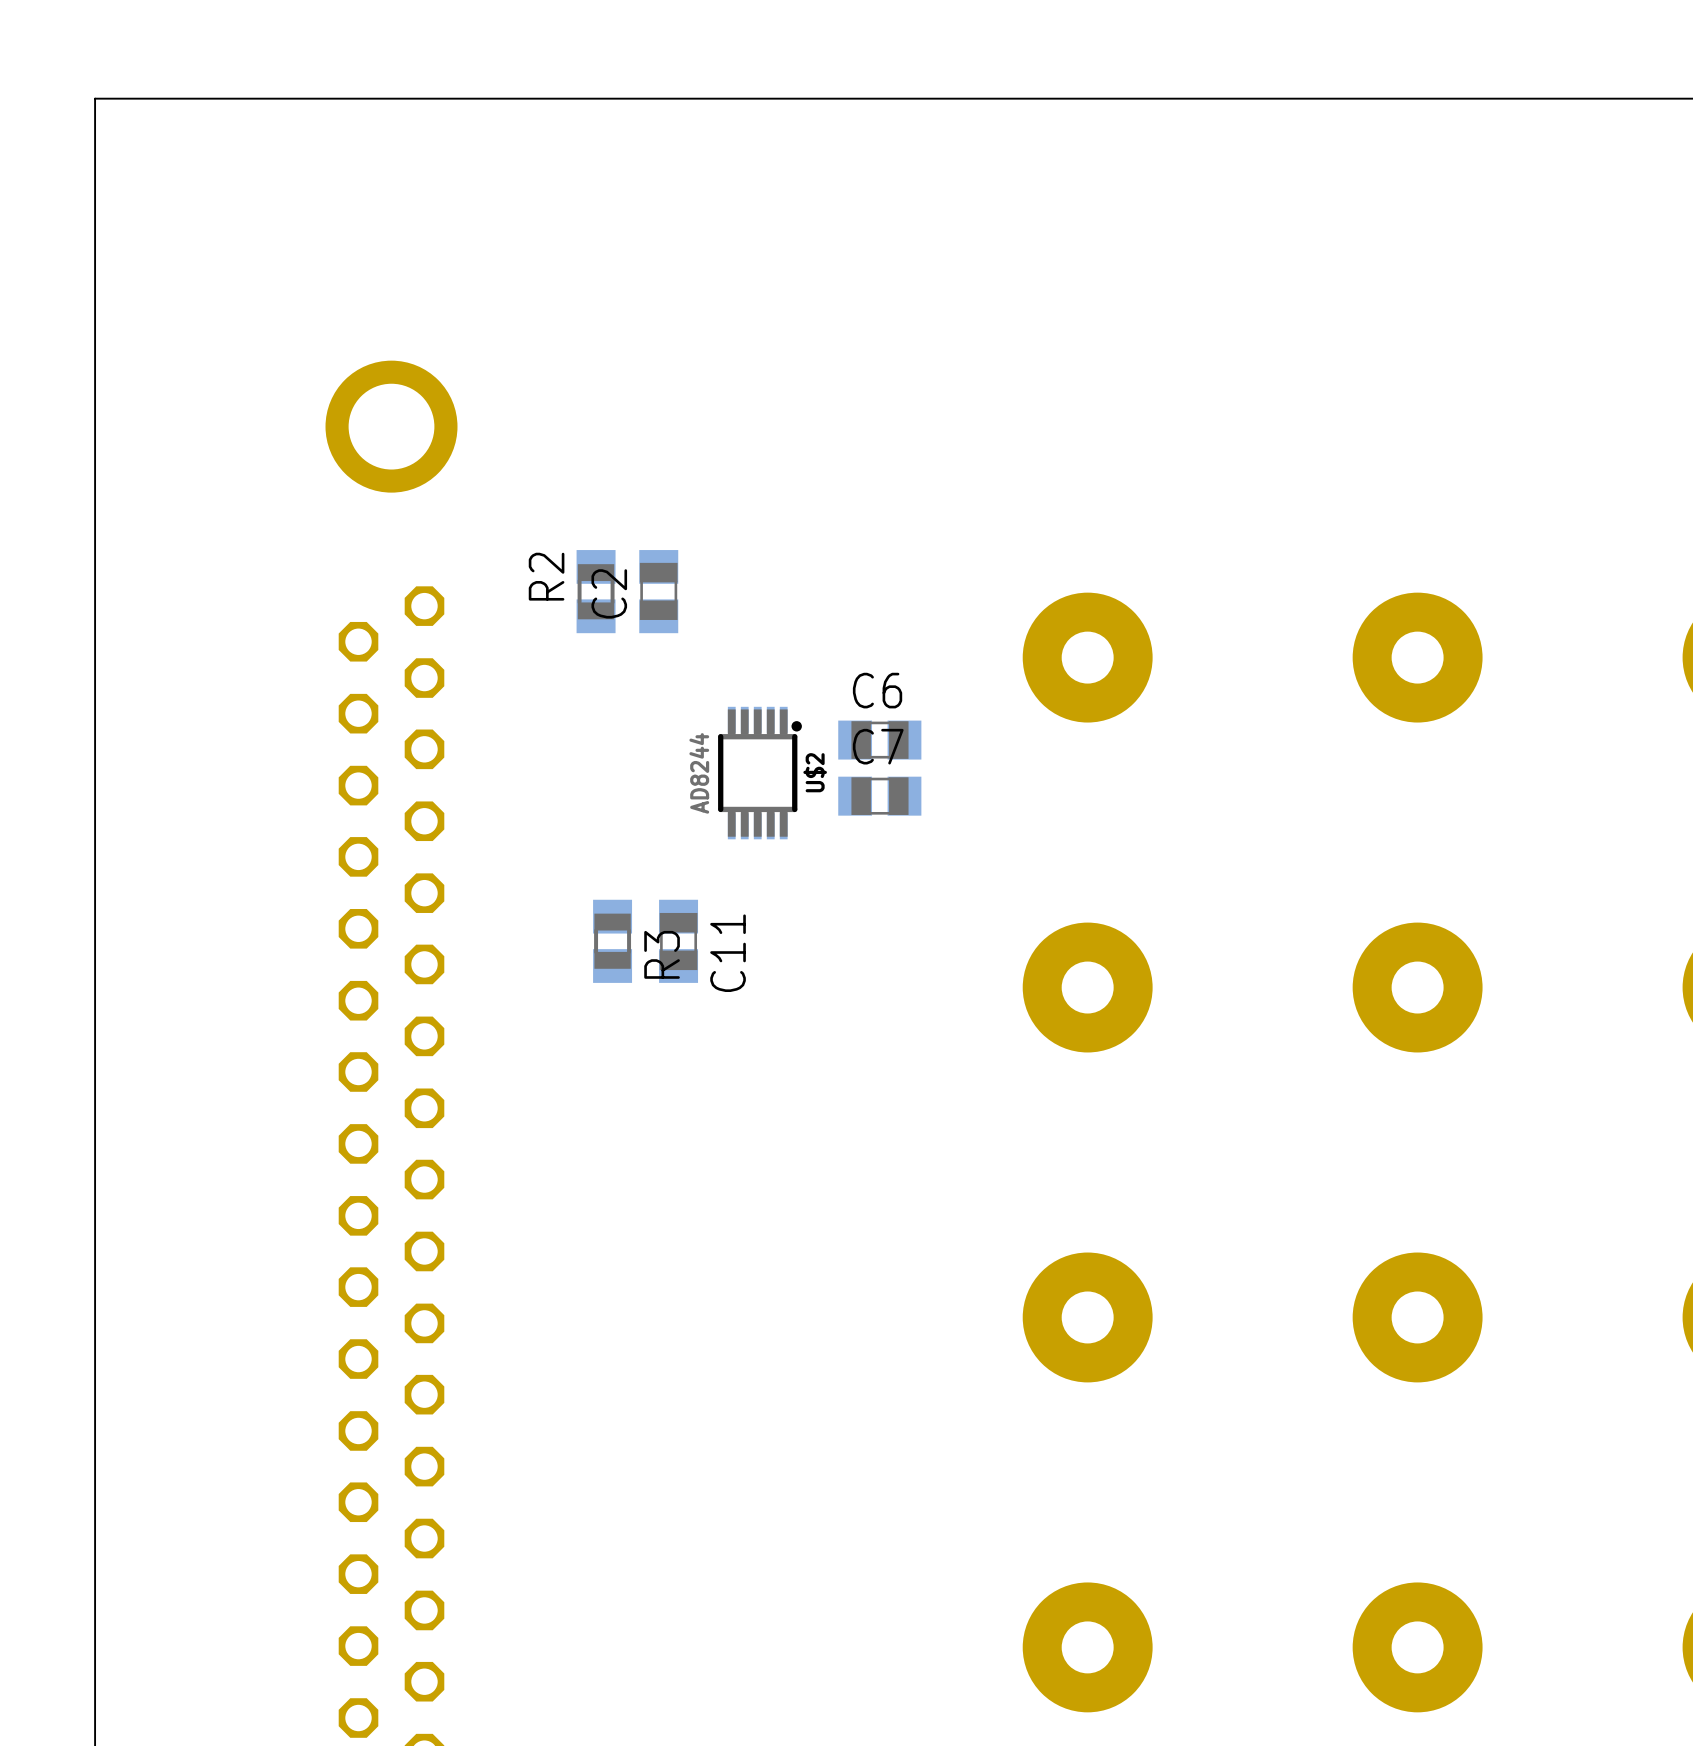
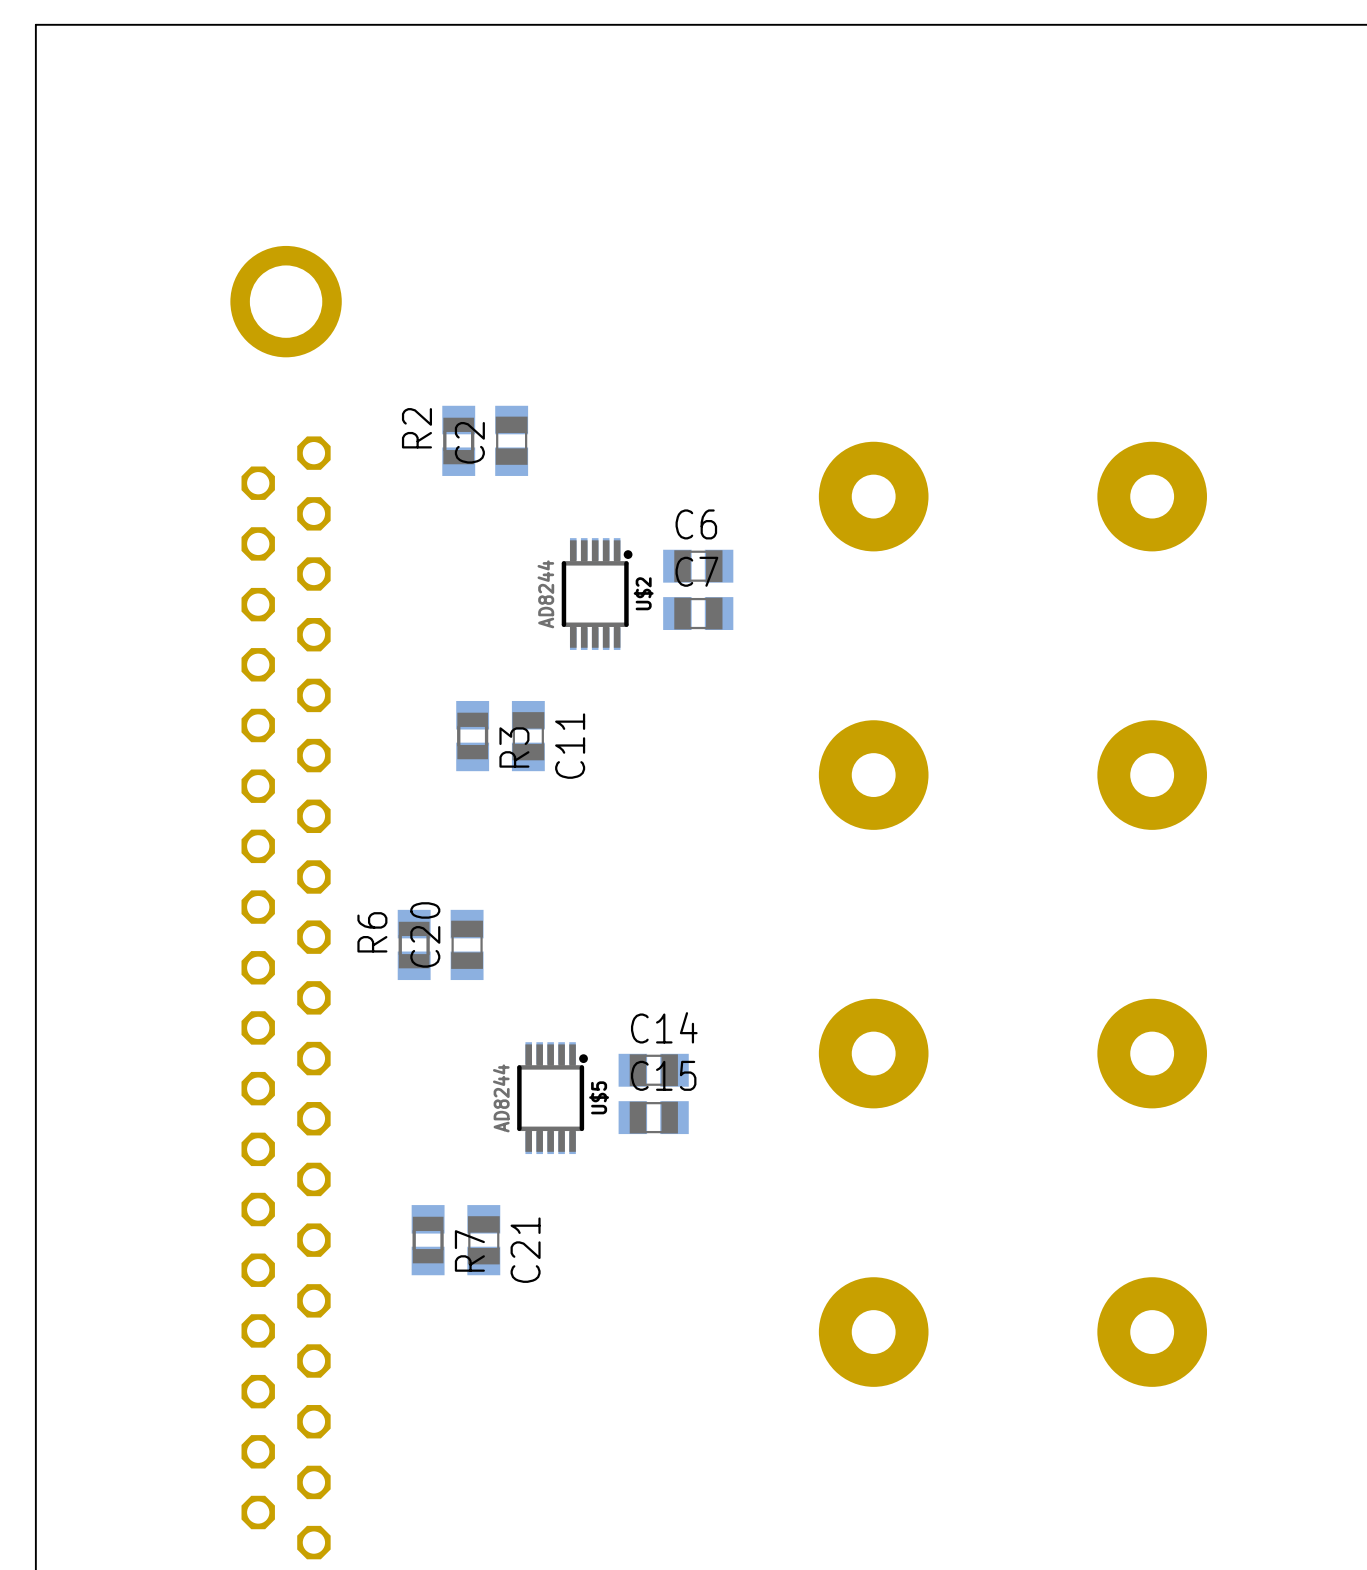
R6: none -> (414, 944)
C20: none -> (467, 944)
C14: none -> (653, 1070)
U$5: none -> AD8244 (552, 1098)
C15: none -> (653, 1117)
R7: none -> (428, 1240)
C21: none -> (483, 1240)

